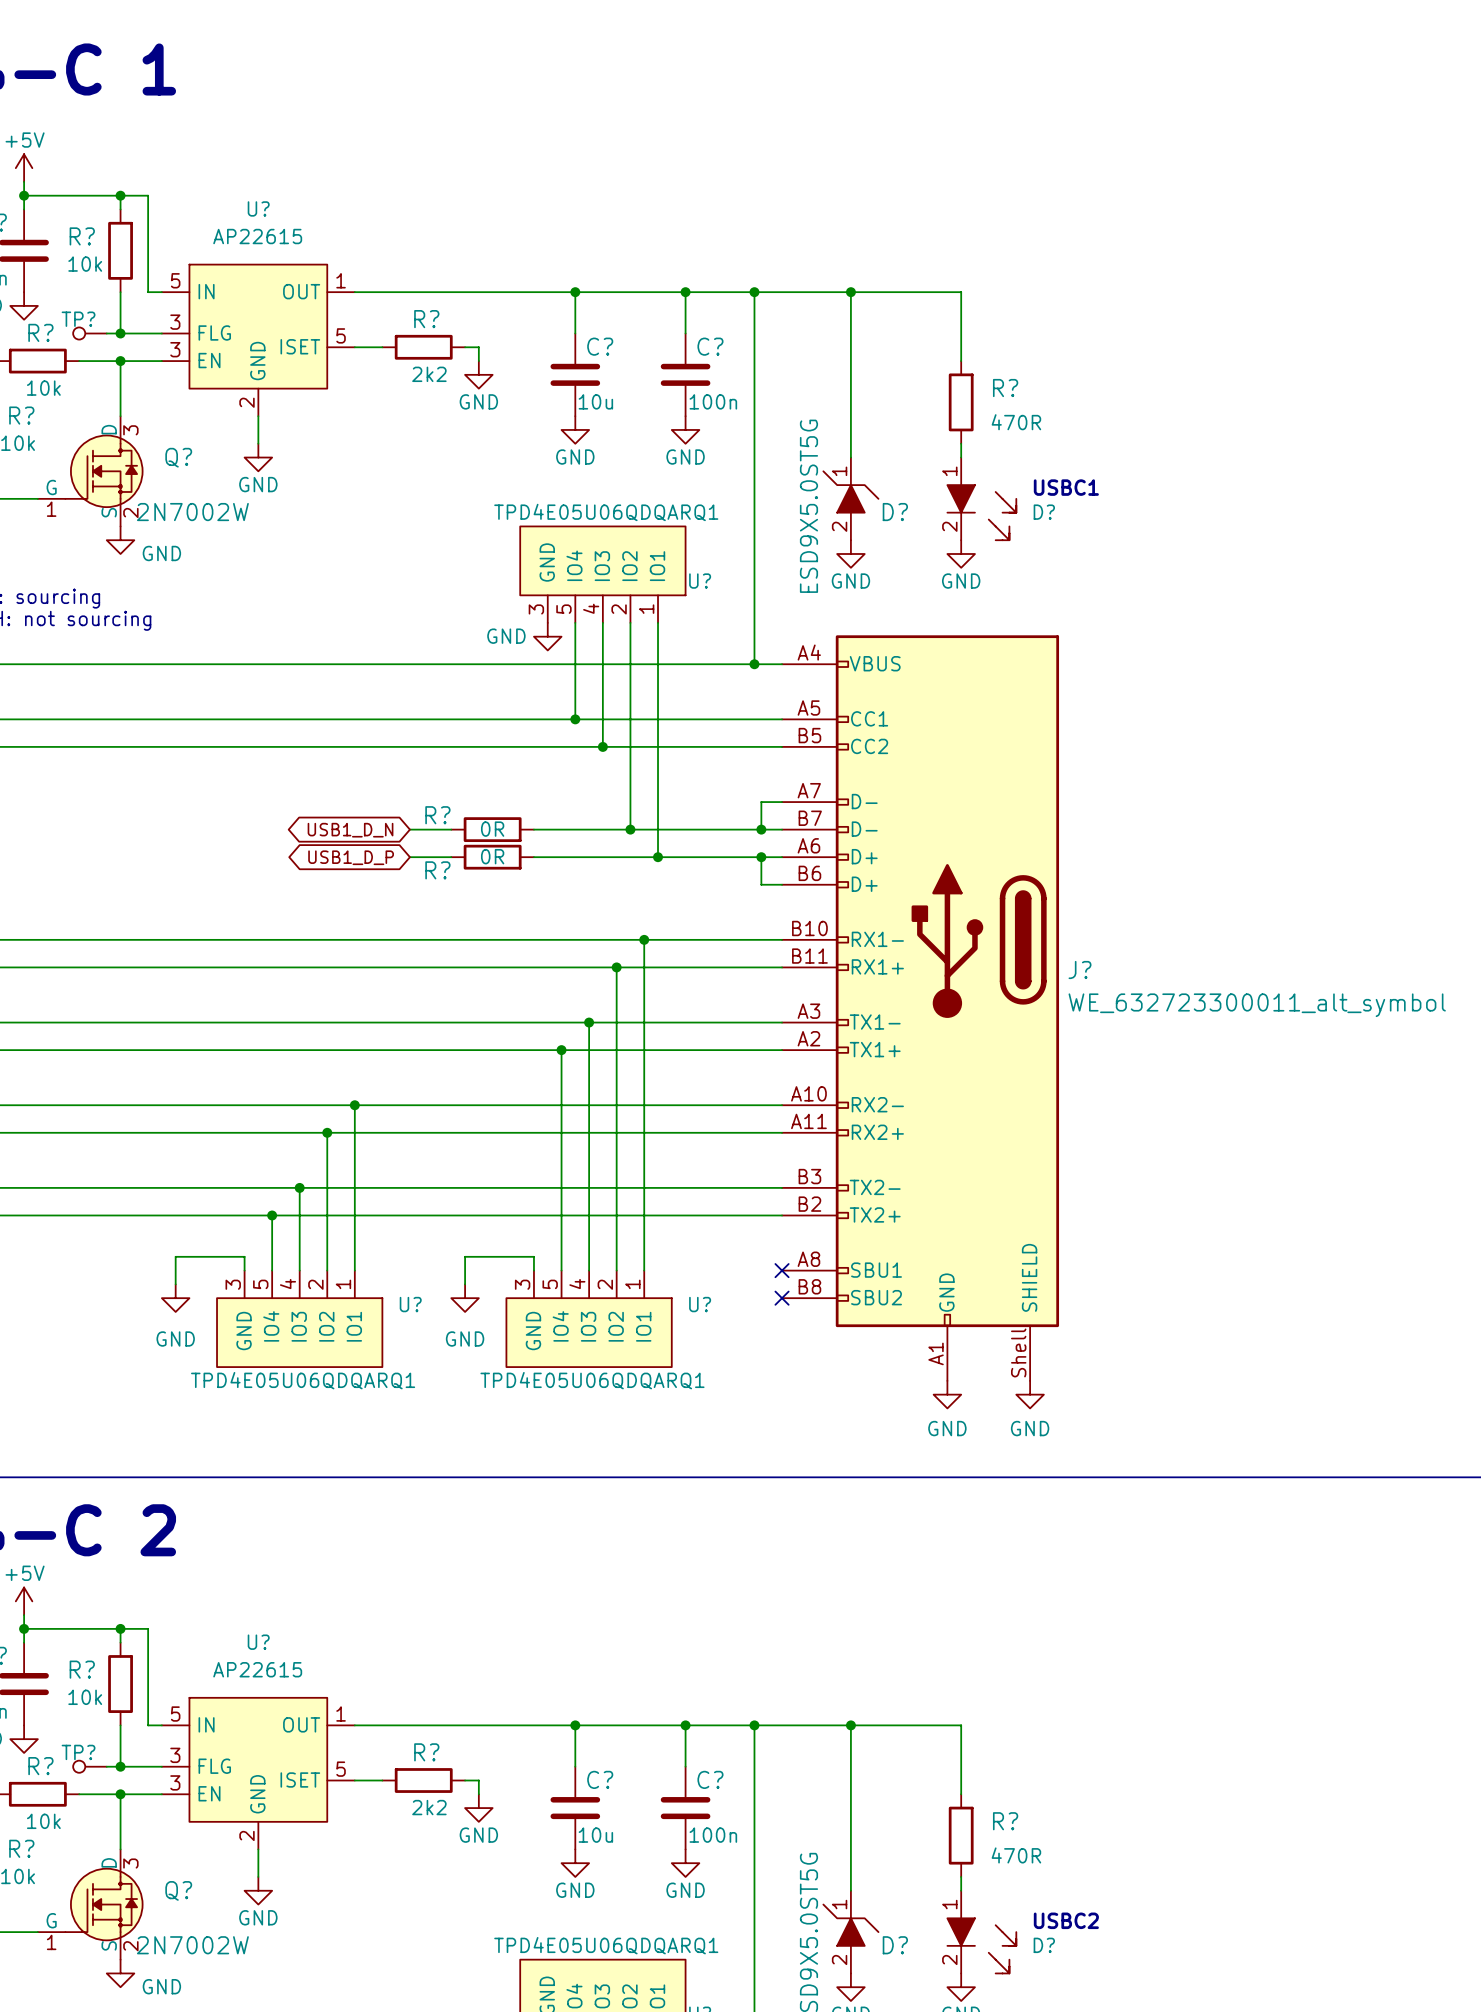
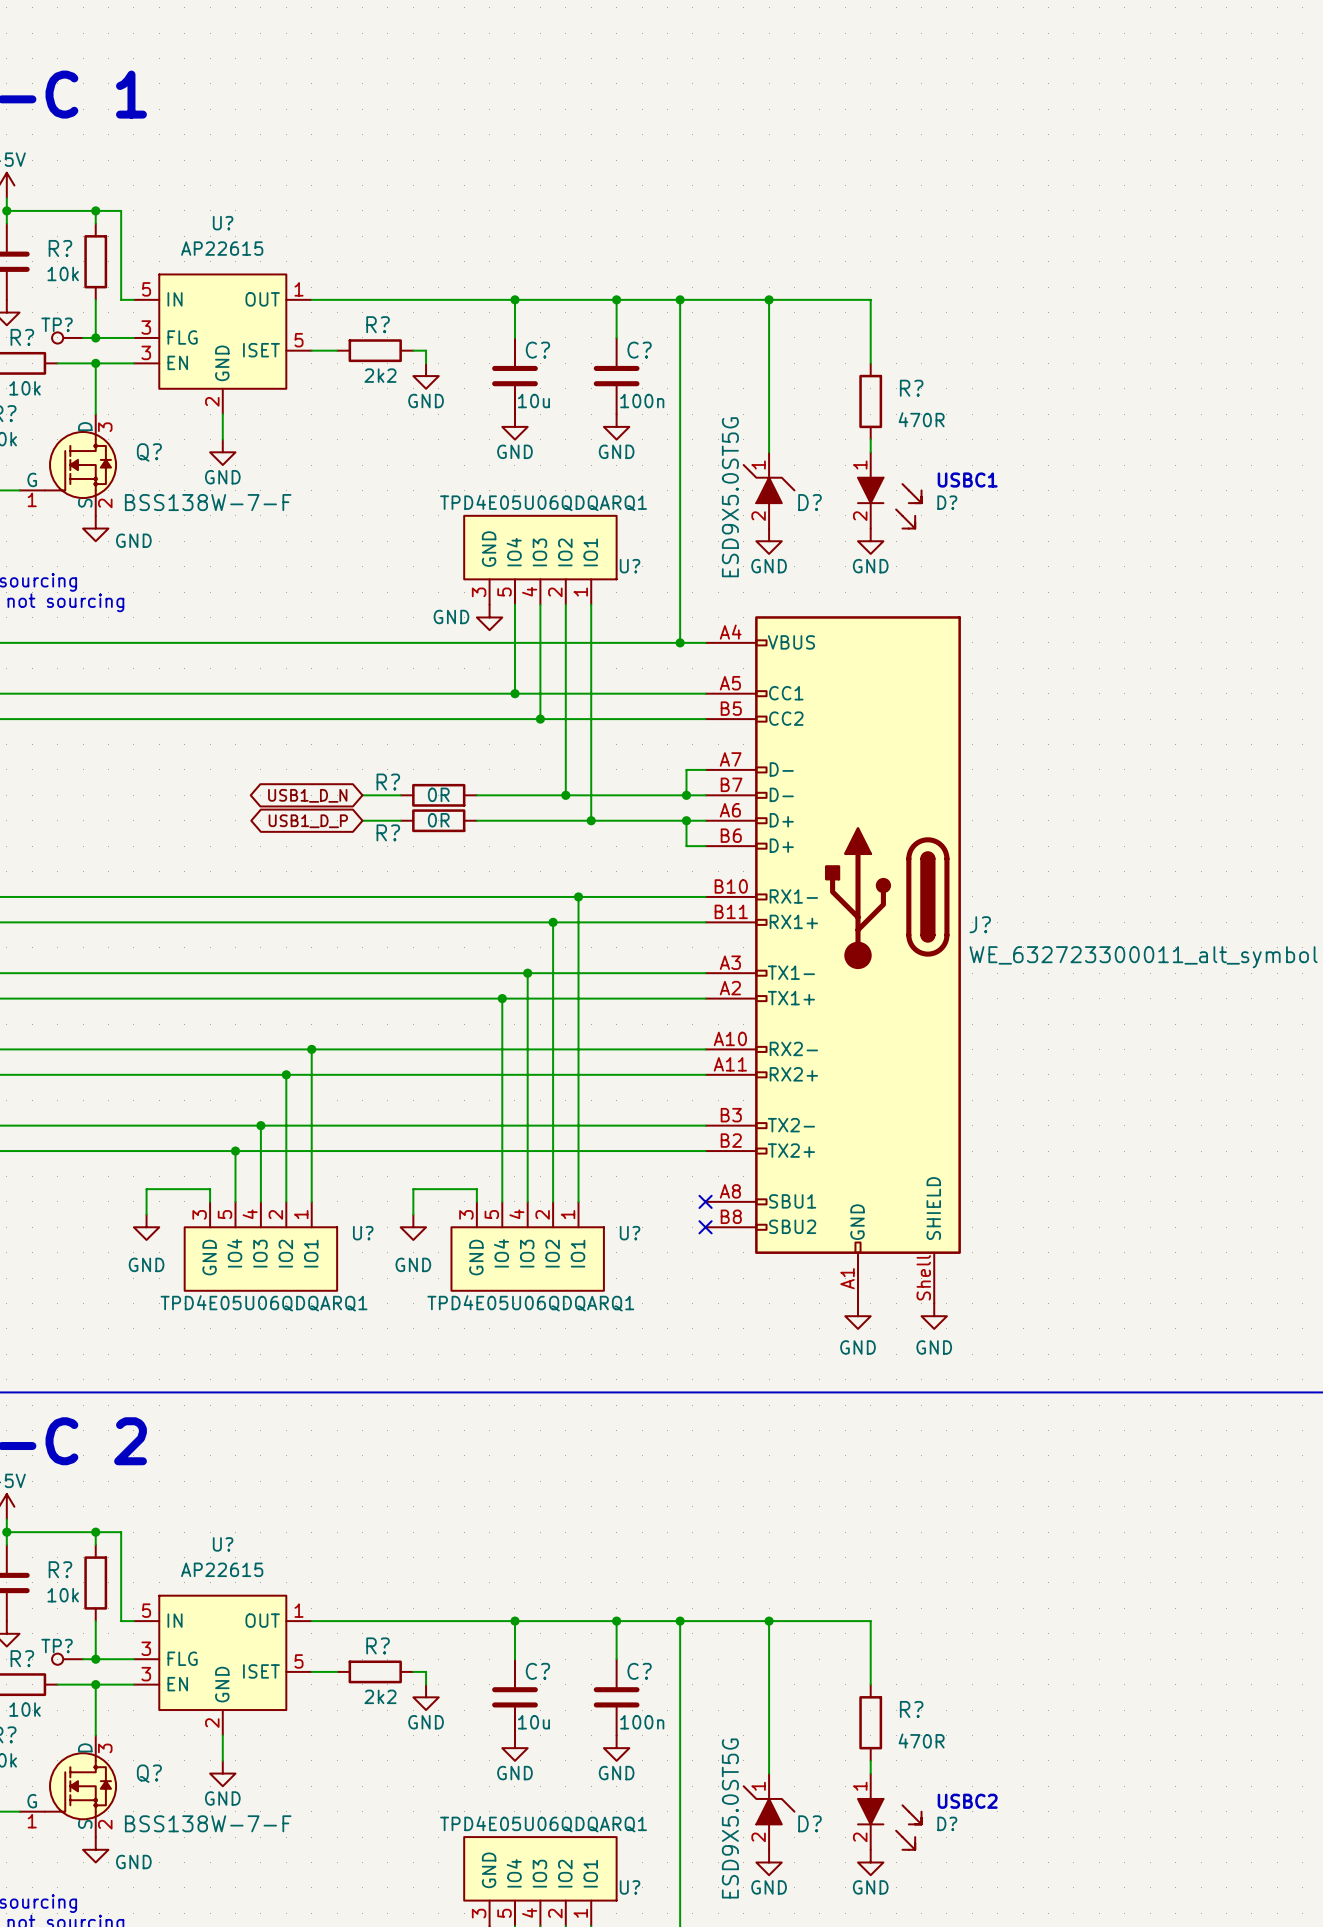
Q? value: 2N7002W (192, 512) -> BSS138W-7-F (208, 502)
Q? value: 2N7002W (192, 1945) -> BSS138W-7-F (208, 1823)

